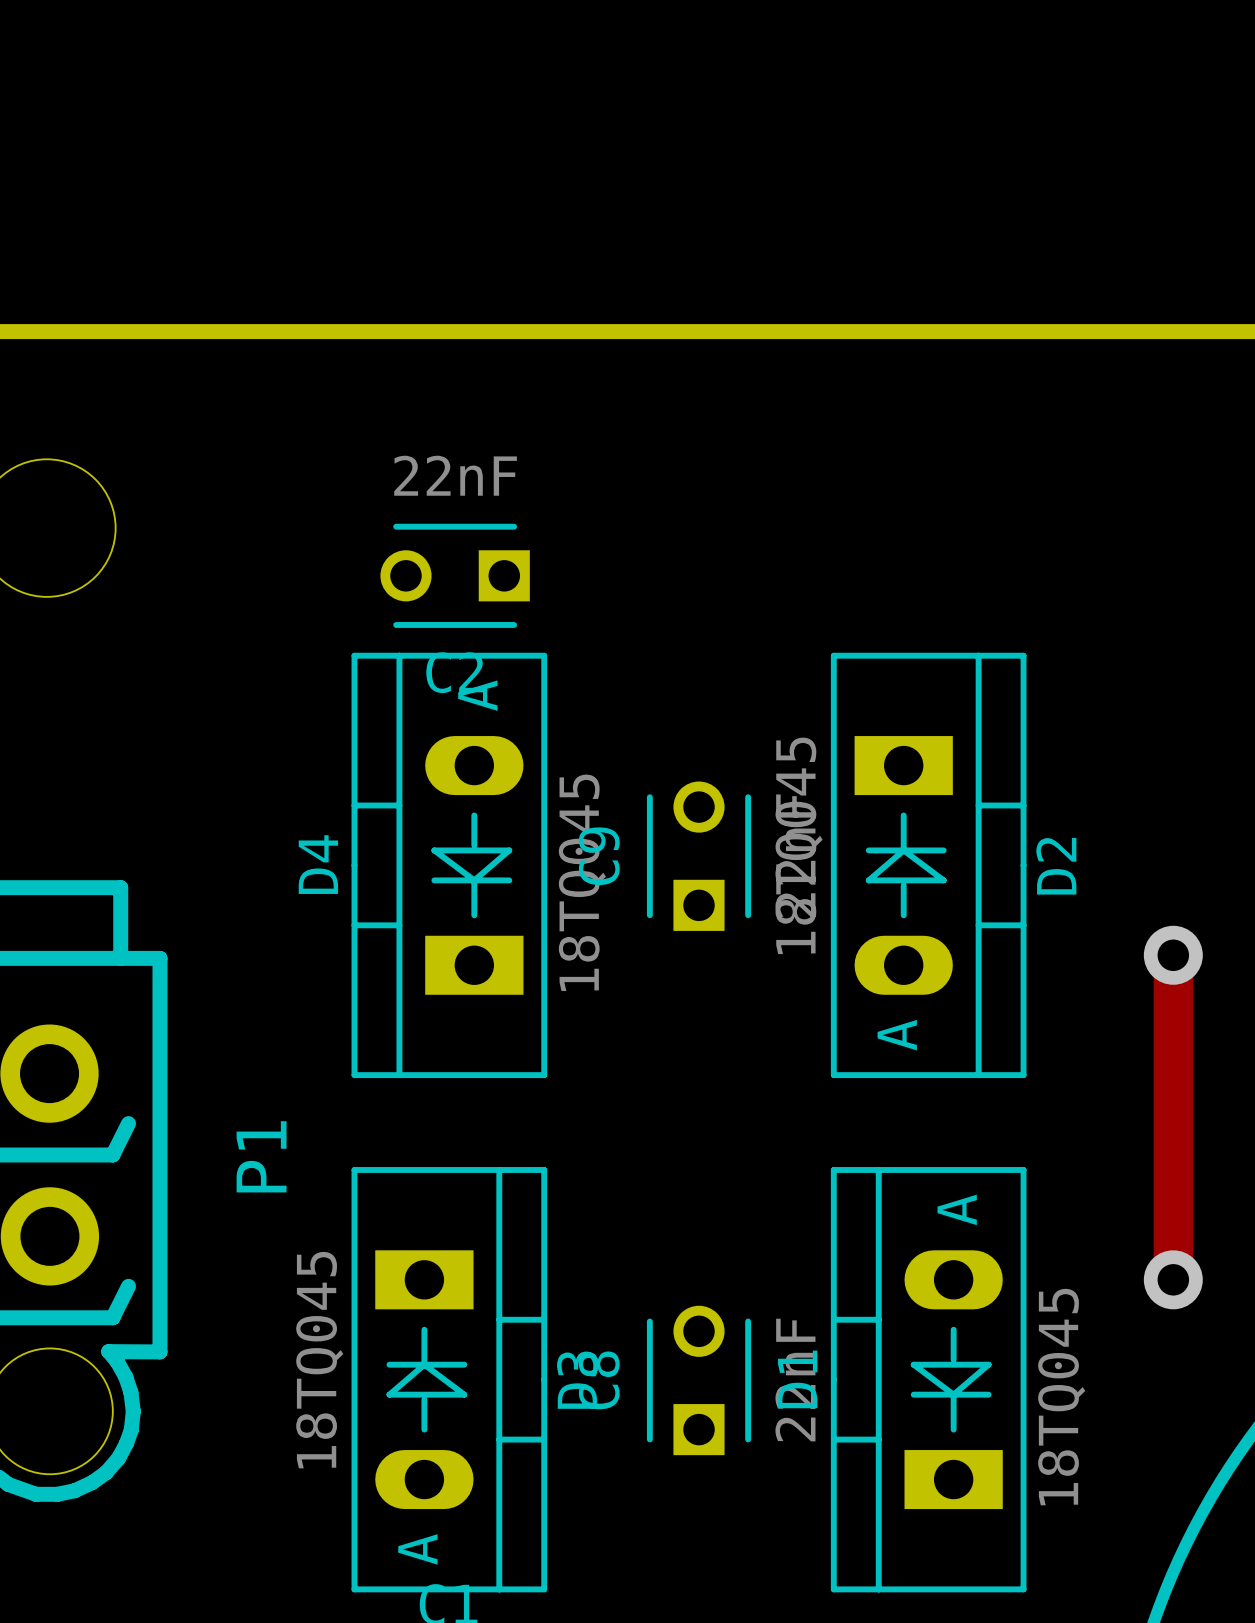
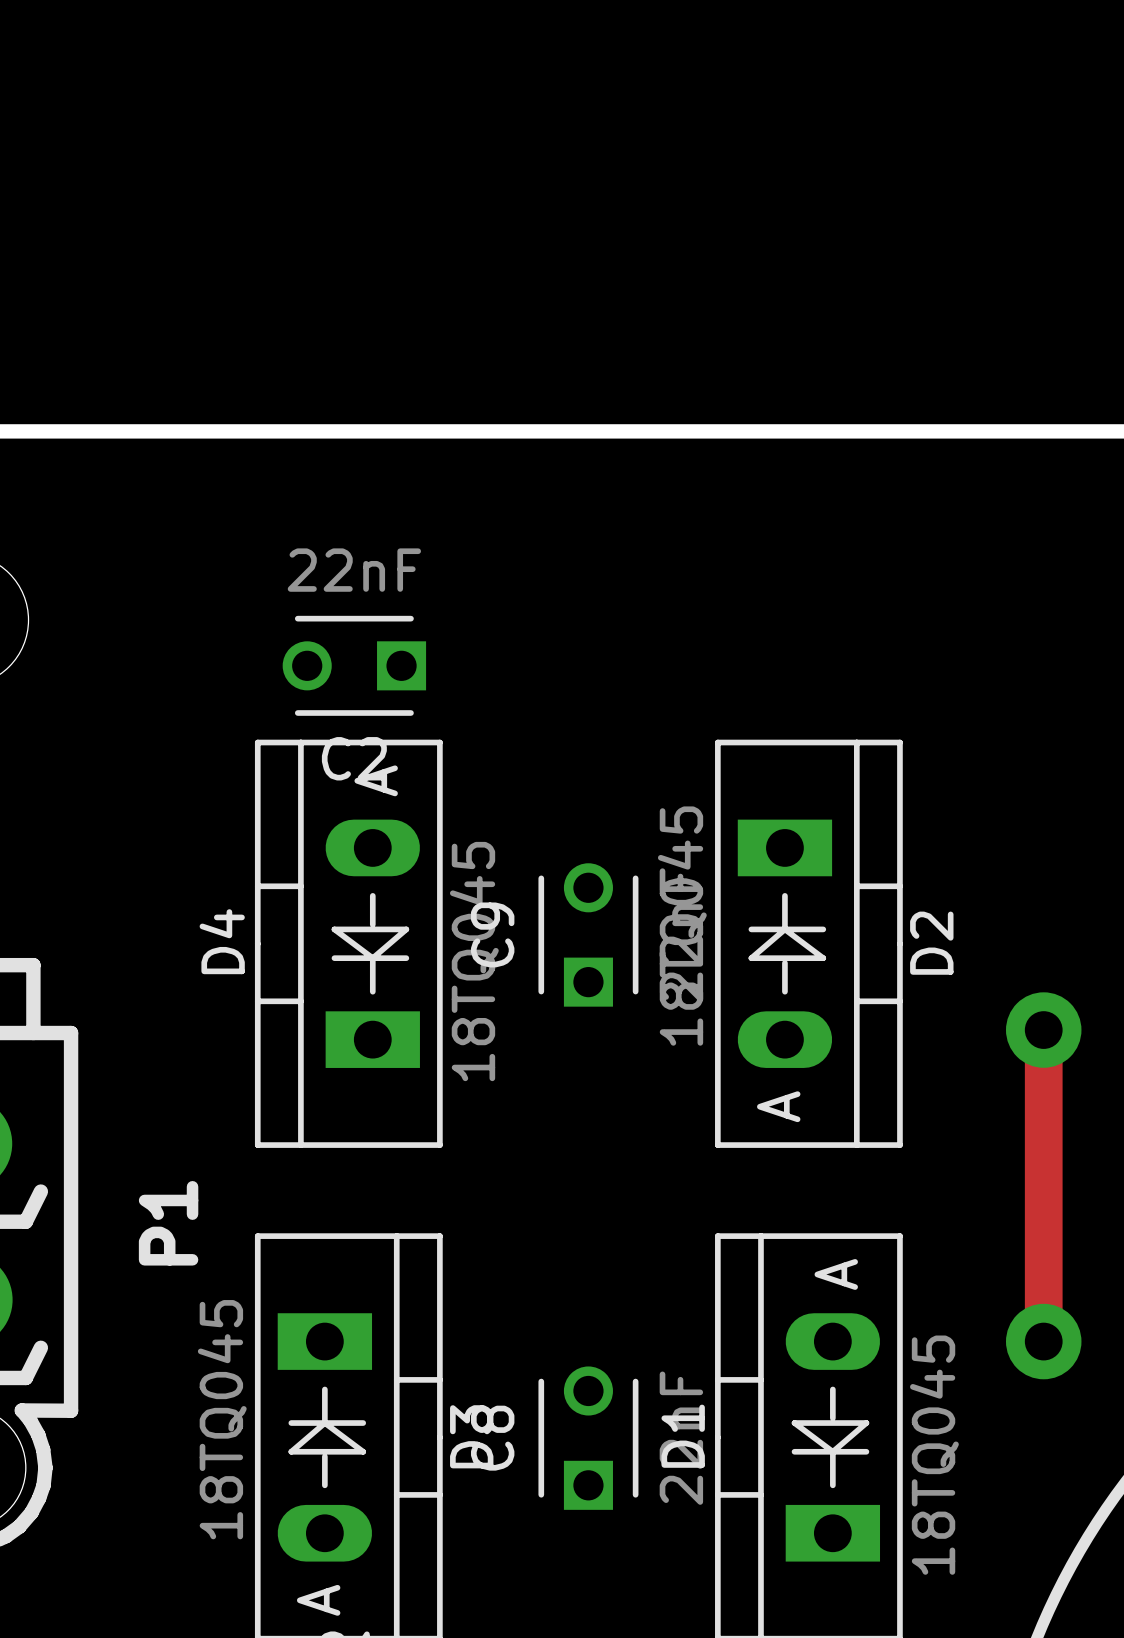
via size: [1143, 925, 1203, 985] -> [1005, 992, 1082, 1068]
via size: [1143, 1250, 1203, 1310] -> [1005, 1303, 1082, 1380]

